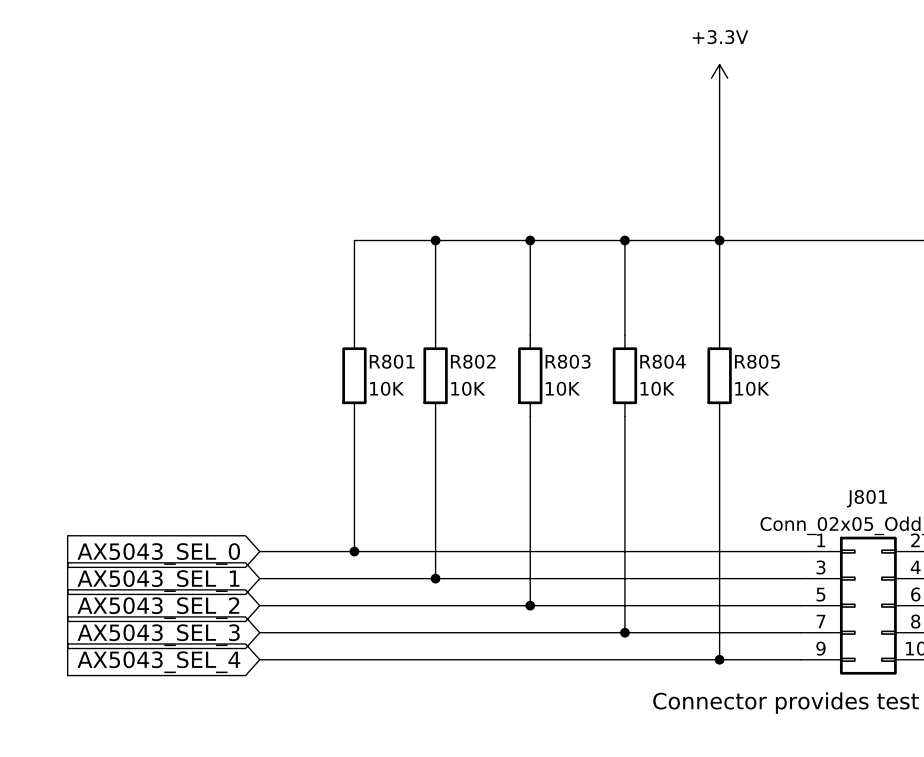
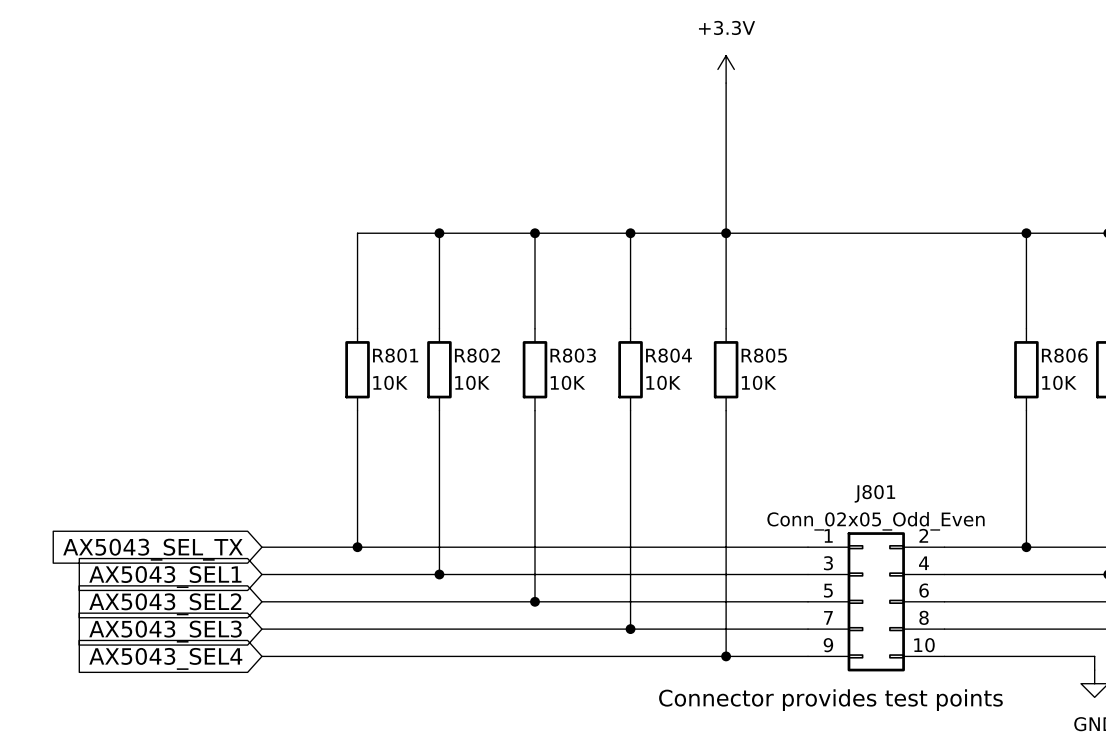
global label: AX5043_SEL_0 (158, 554) -> AX5043_SEL_TX (153, 549)
global label: AX5043_SEL_1 (158, 581) -> AX5043_SEL1 (165, 577)
global label: AX5043_SEL_2 (158, 608) -> AX5043_SEL2 (165, 604)
global label: AX5043_SEL_3 (158, 635) -> AX5043_SEL3 (165, 631)
global label: AX5043_SEL_4 (158, 662) -> AX5043_SEL4 (165, 658)

